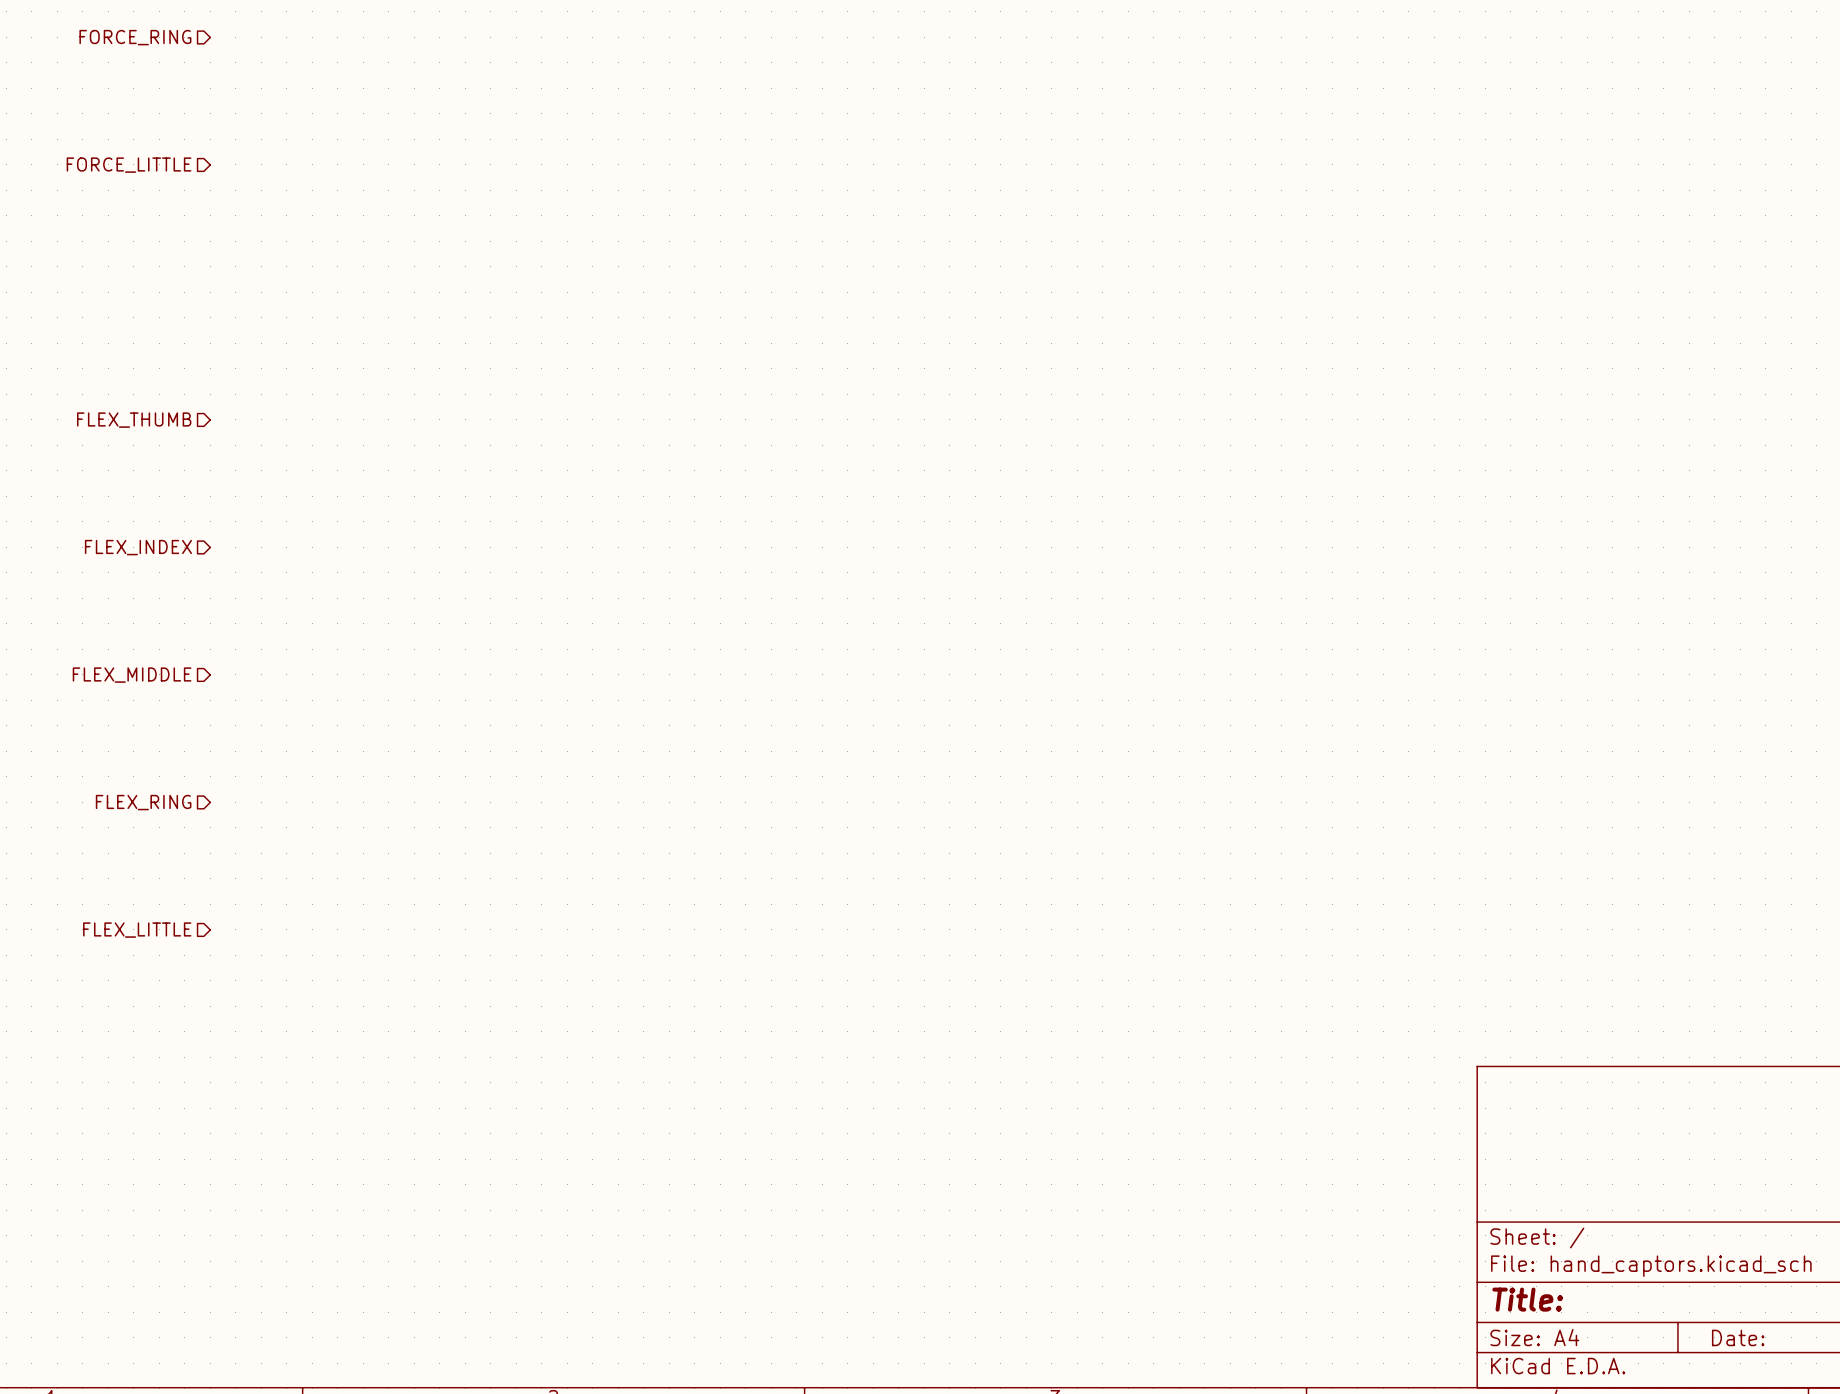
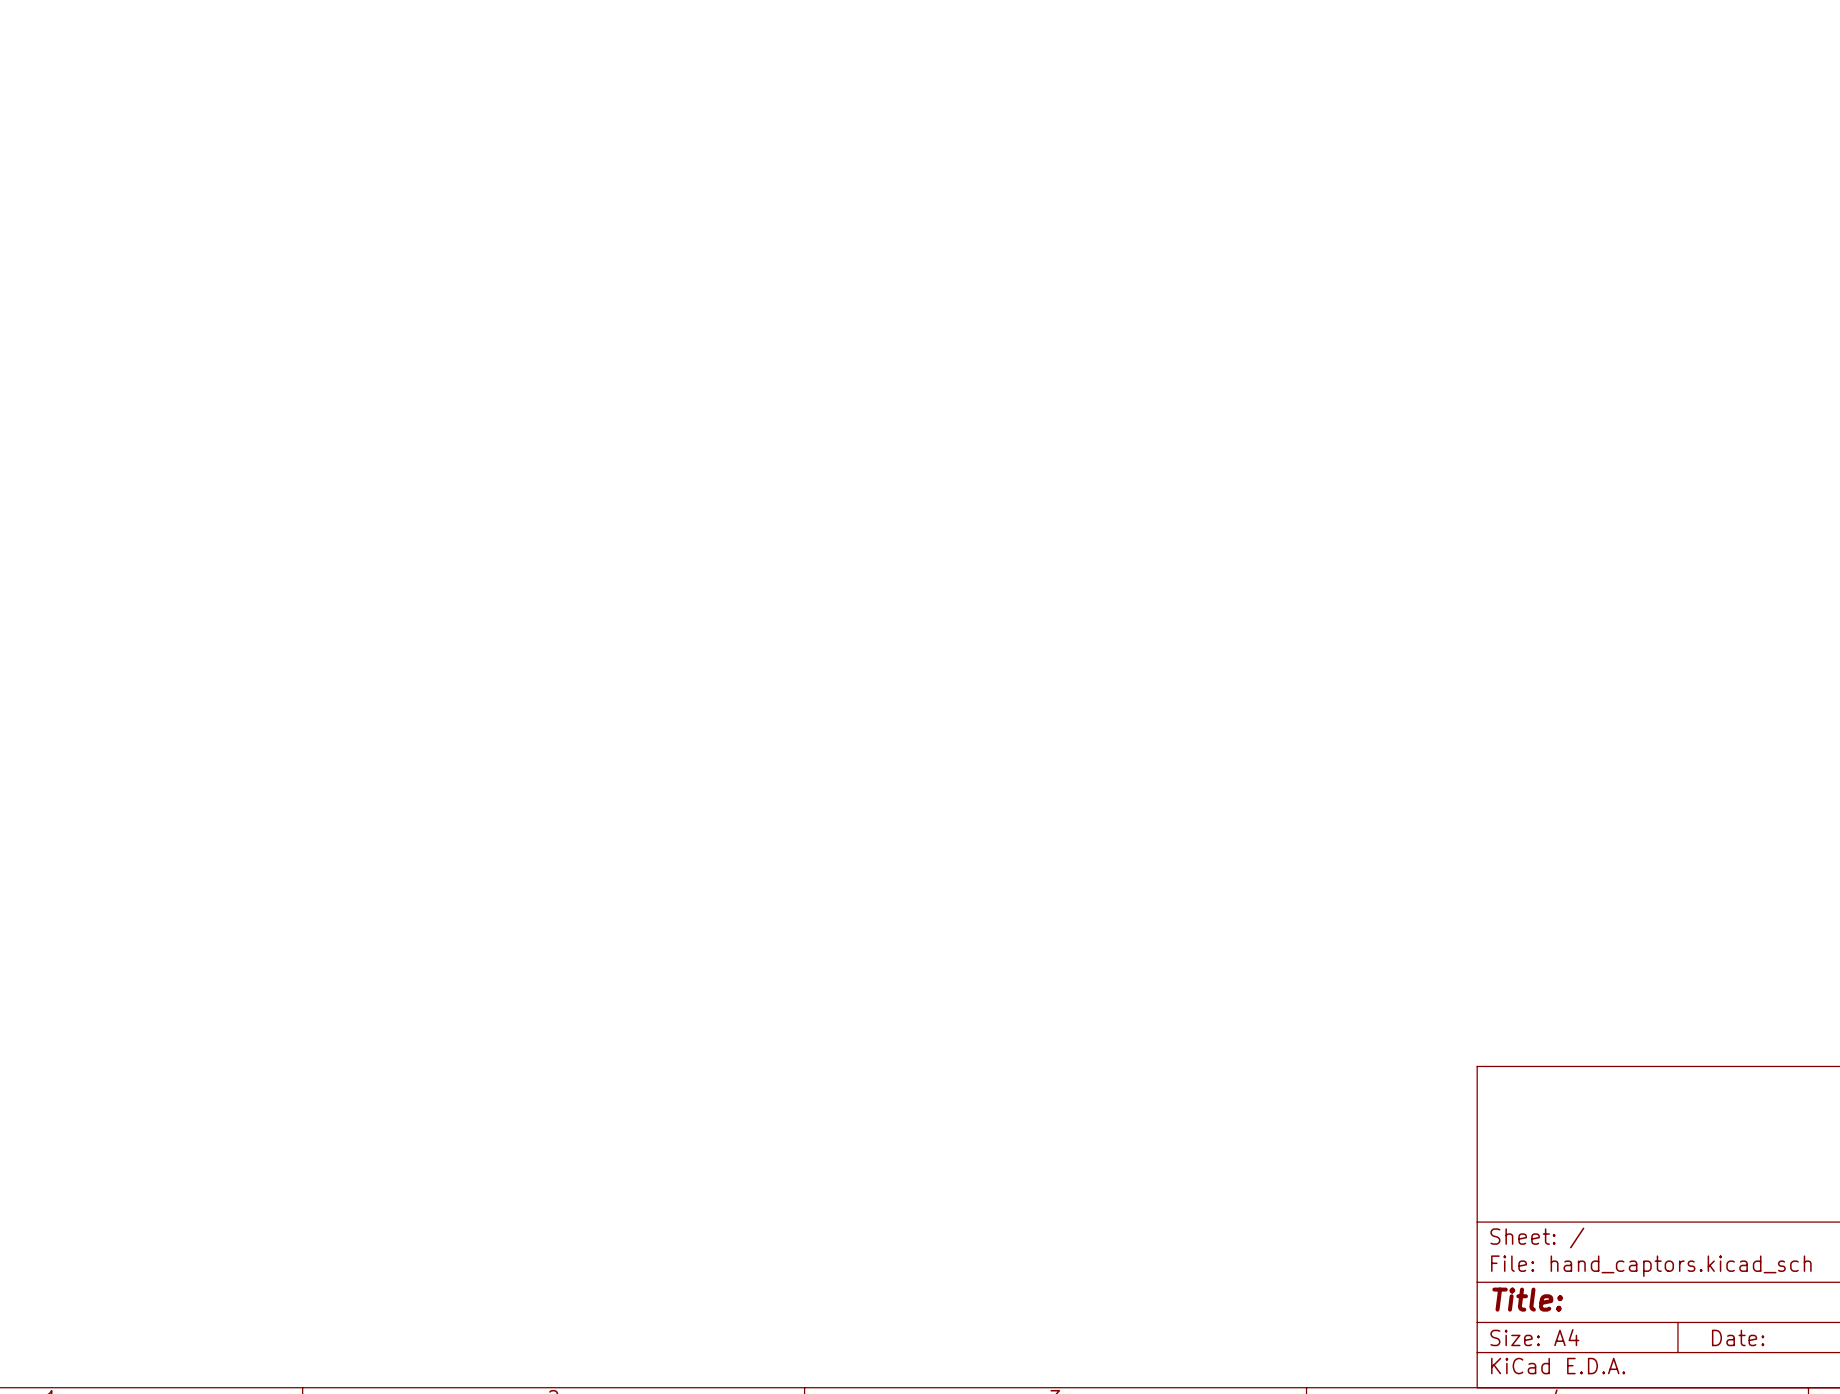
hierarchical label: FORCE_RING (135, 37) -> none
hierarchical label: FORCE_LITTLE (129, 165) -> none
hierarchical label: FLEX_THUMB (134, 420) -> none
hierarchical label: FLEX_INDEX (138, 547) -> none
hierarchical label: FLEX_MIDDLE (132, 675) -> none
hierarchical label: FLEX_RING (143, 802) -> none
hierarchical label: FLEX_LITTLE (137, 930) -> none

